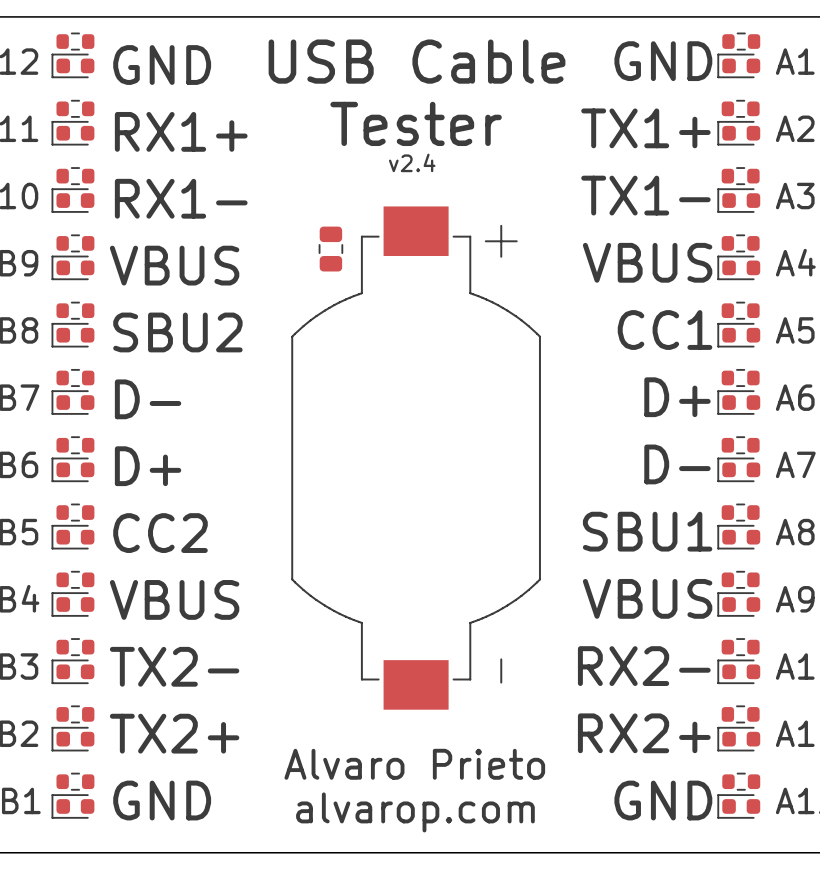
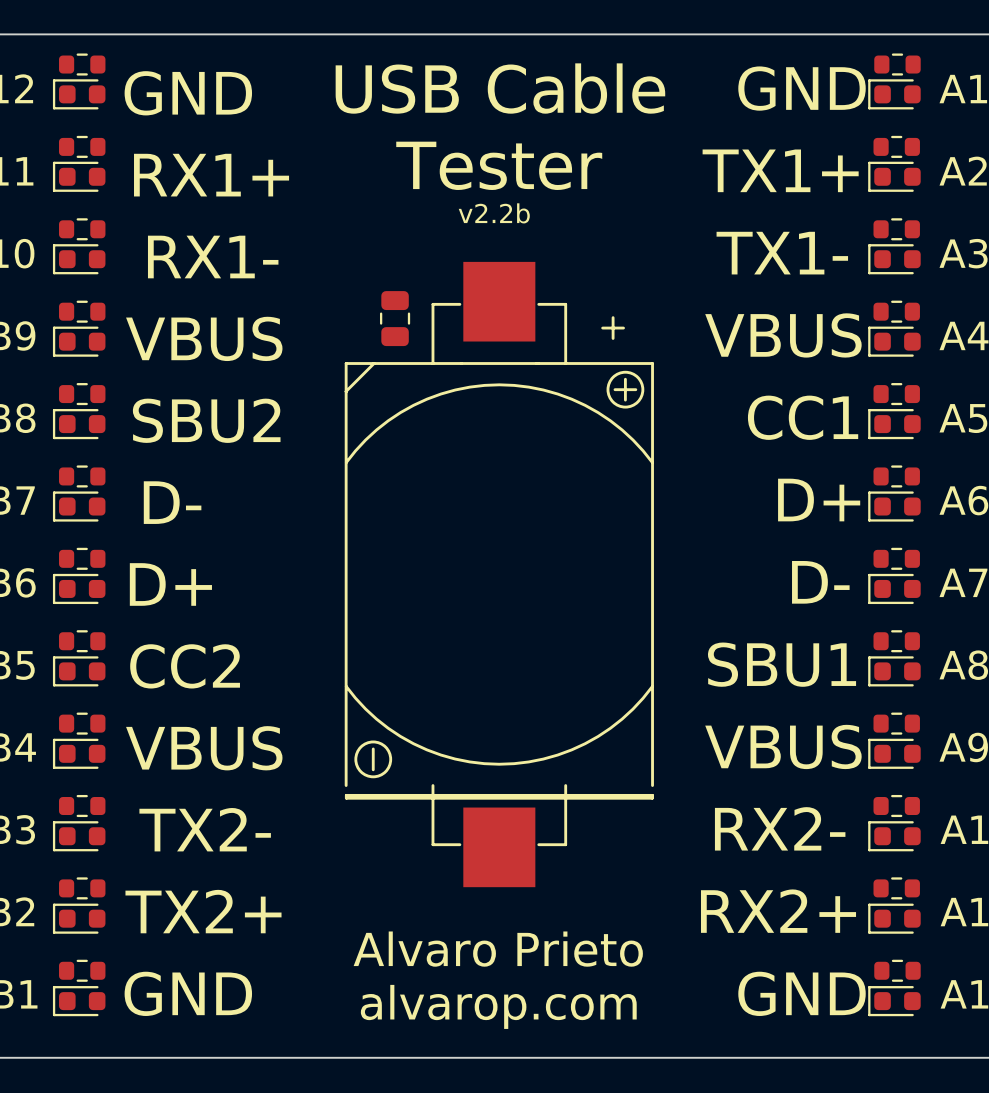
text: v2.4 (412, 162) -> v2.2b (494, 213)
part footprint: [291, 206, 541, 710] -> [344, 261, 654, 888]

